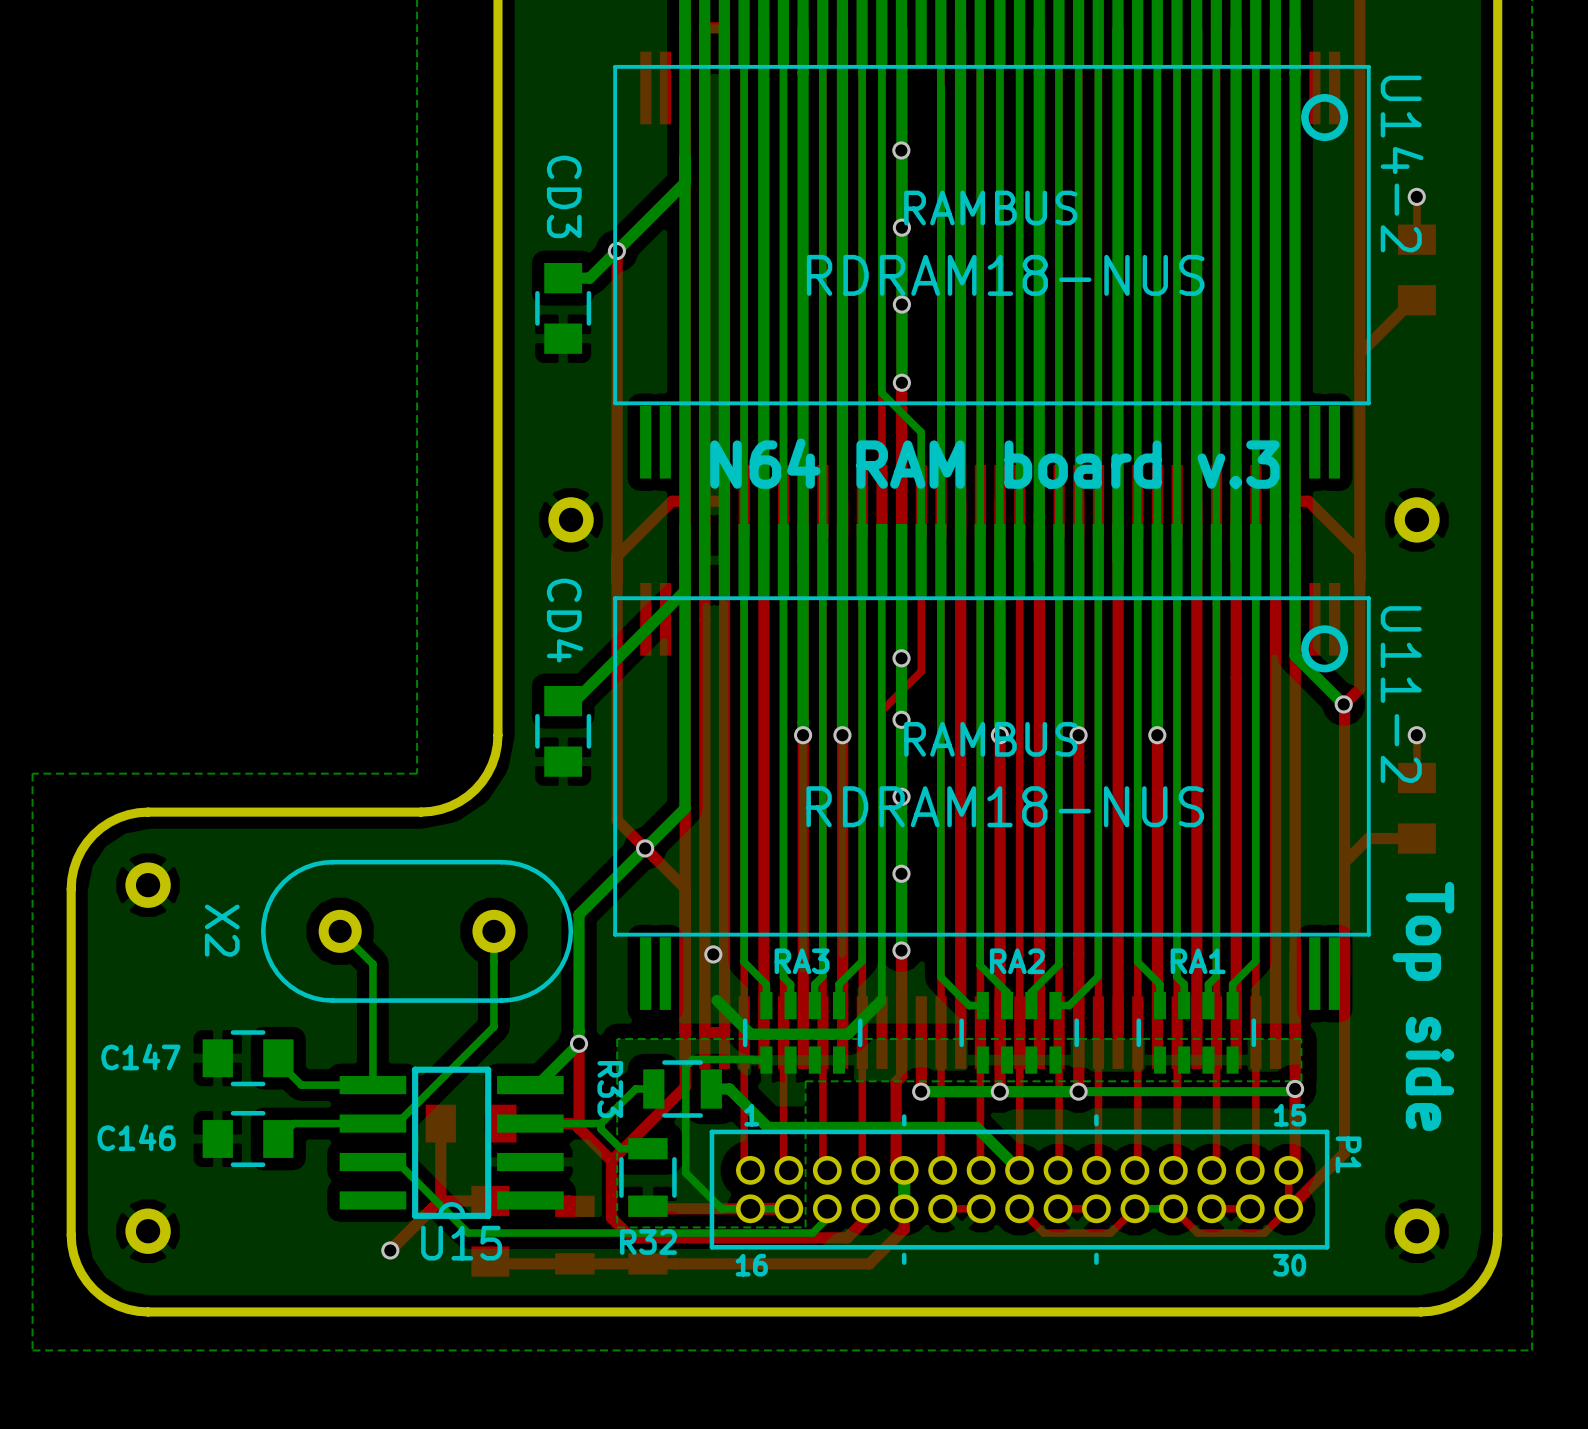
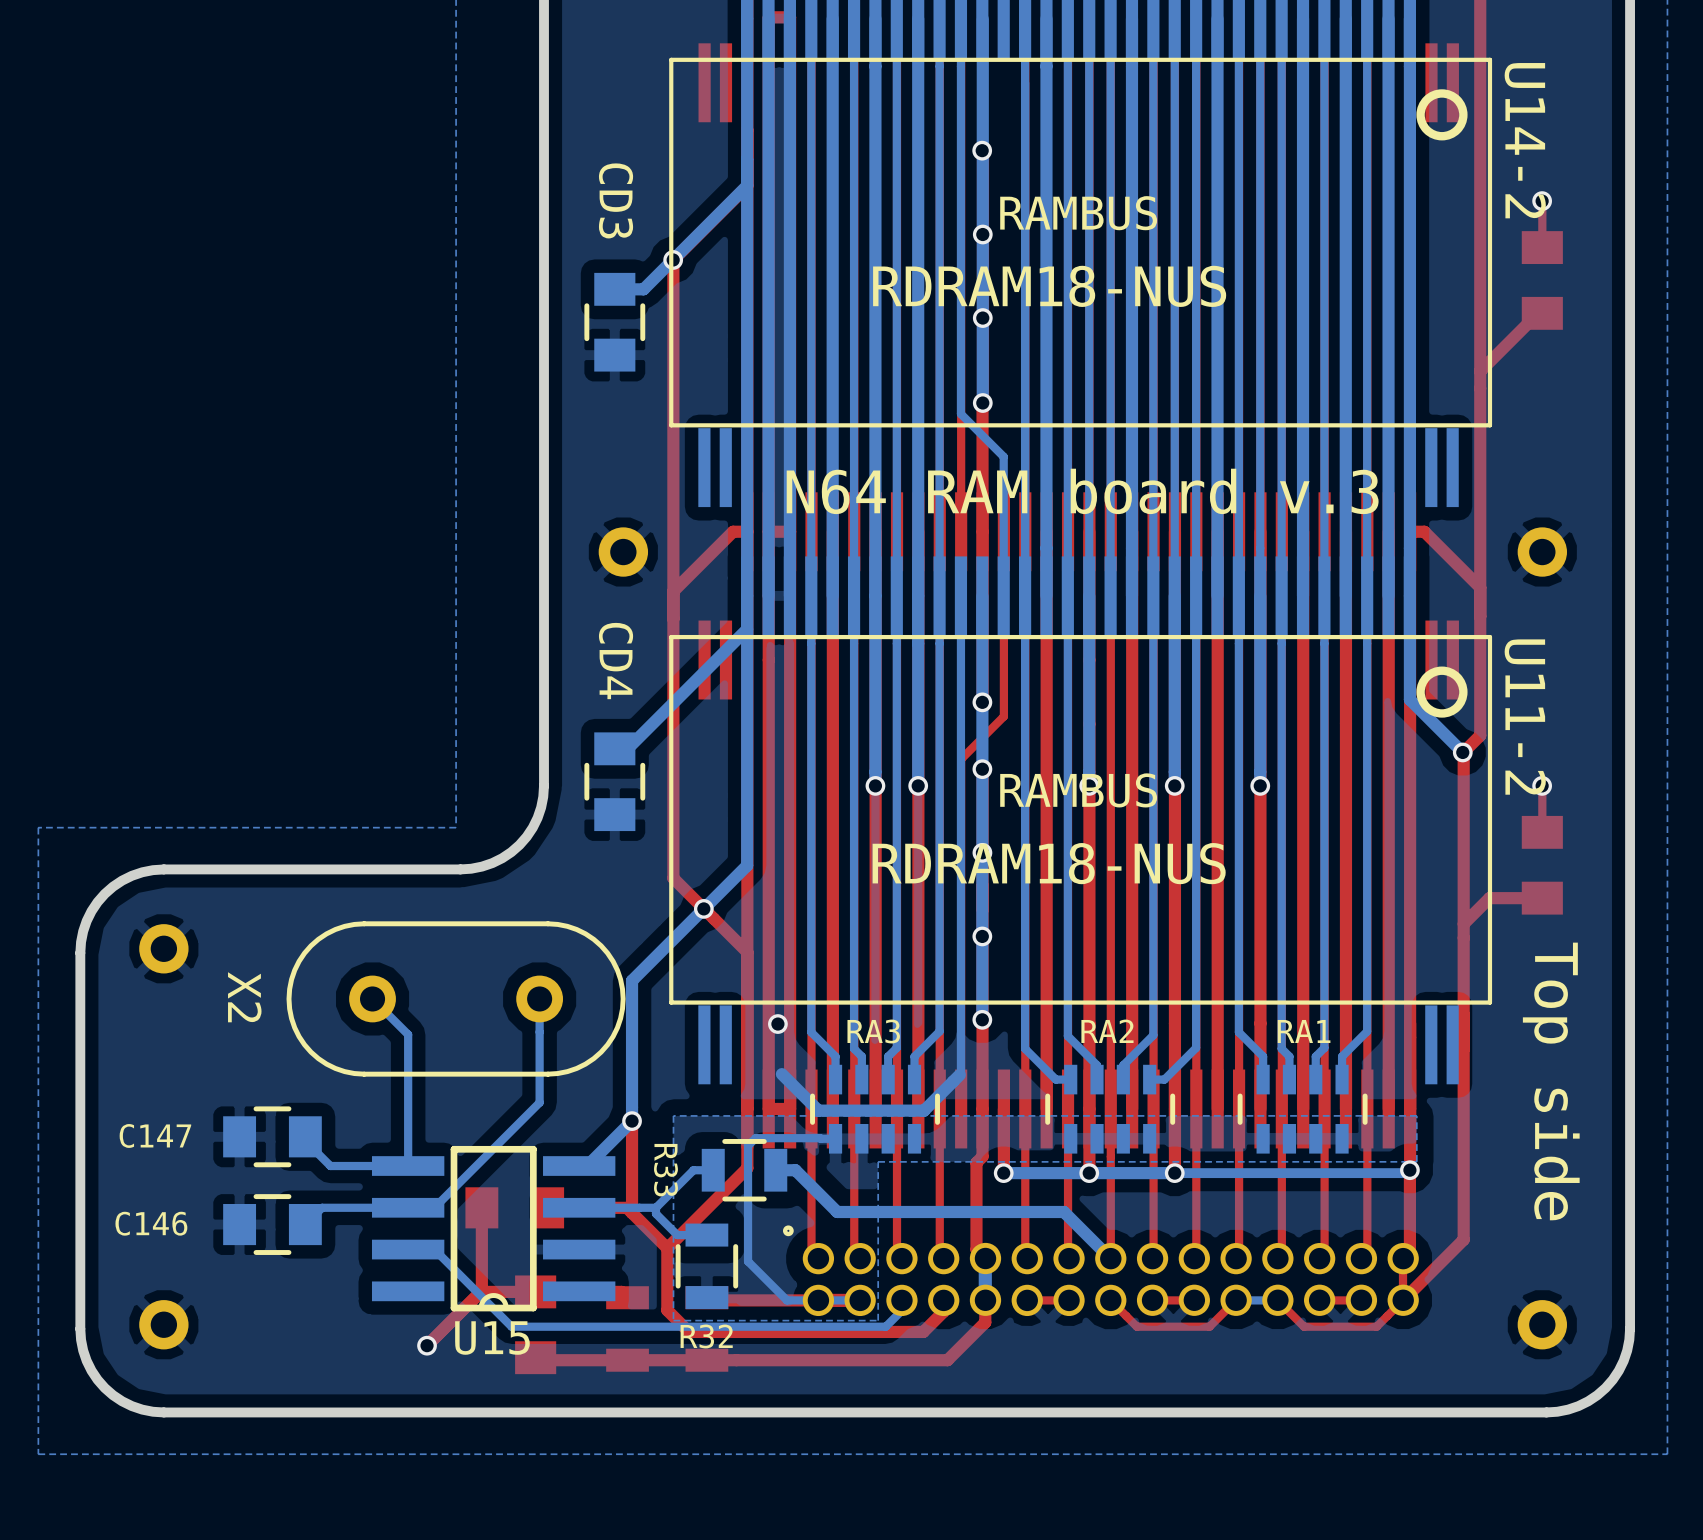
drawing: none -> [782, 1225, 794, 1237]
P1 side: bottom (1019, 1189) -> top (1110, 1279)

